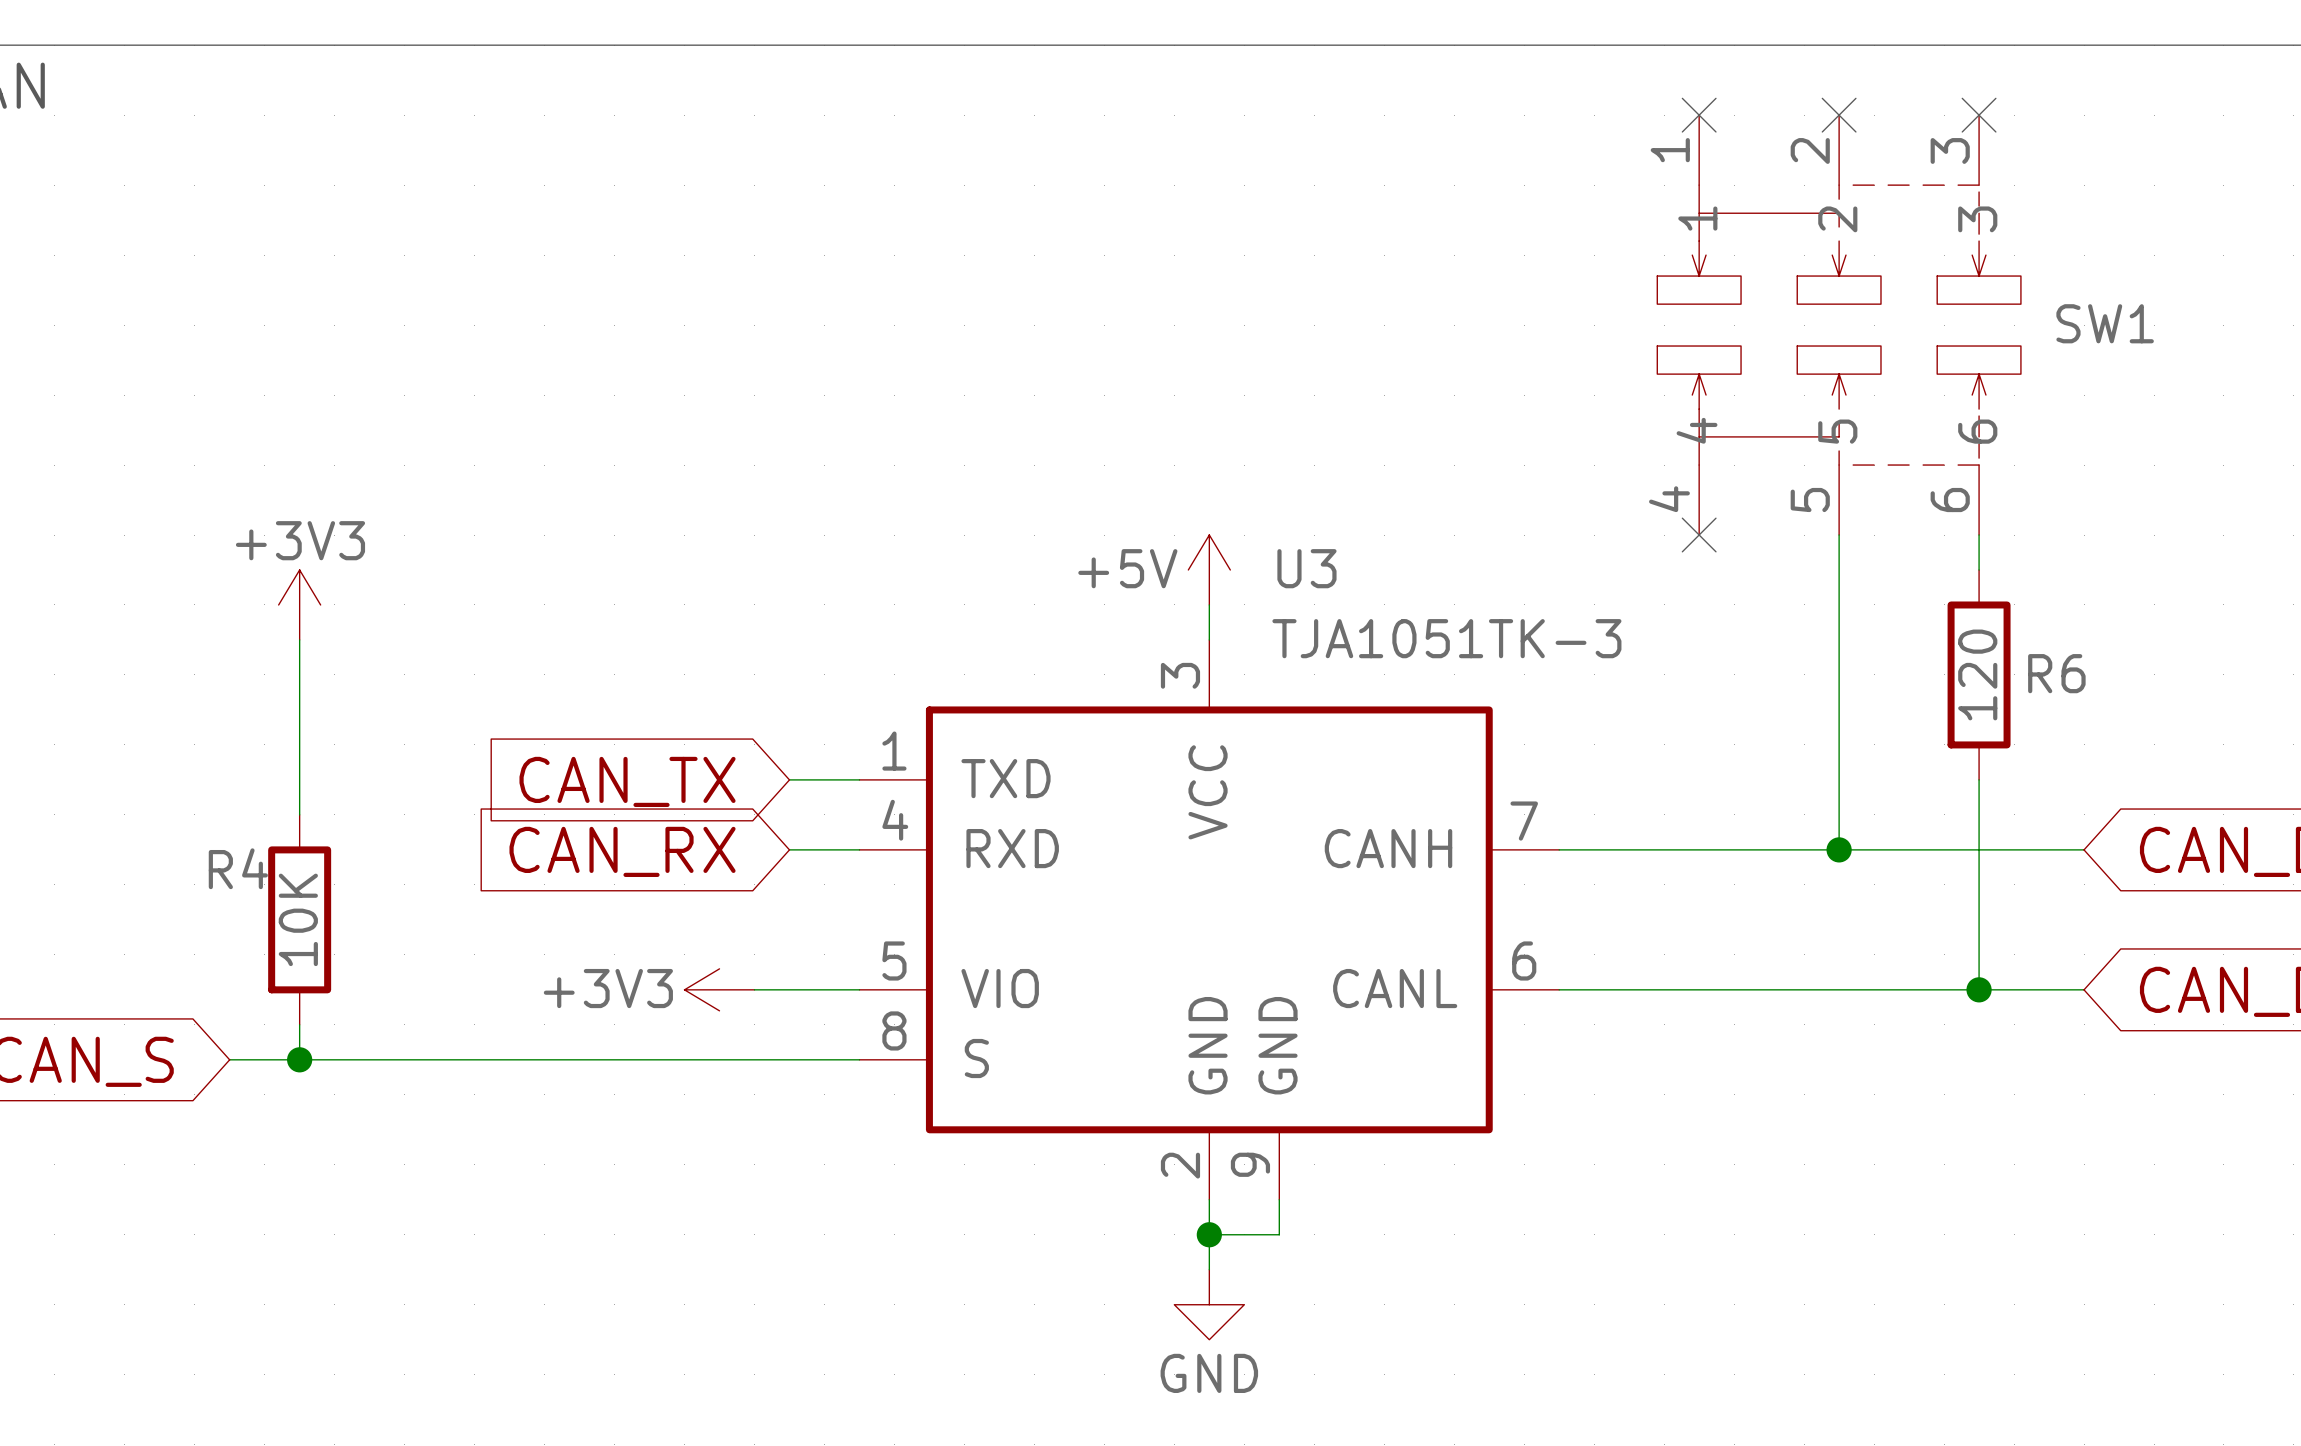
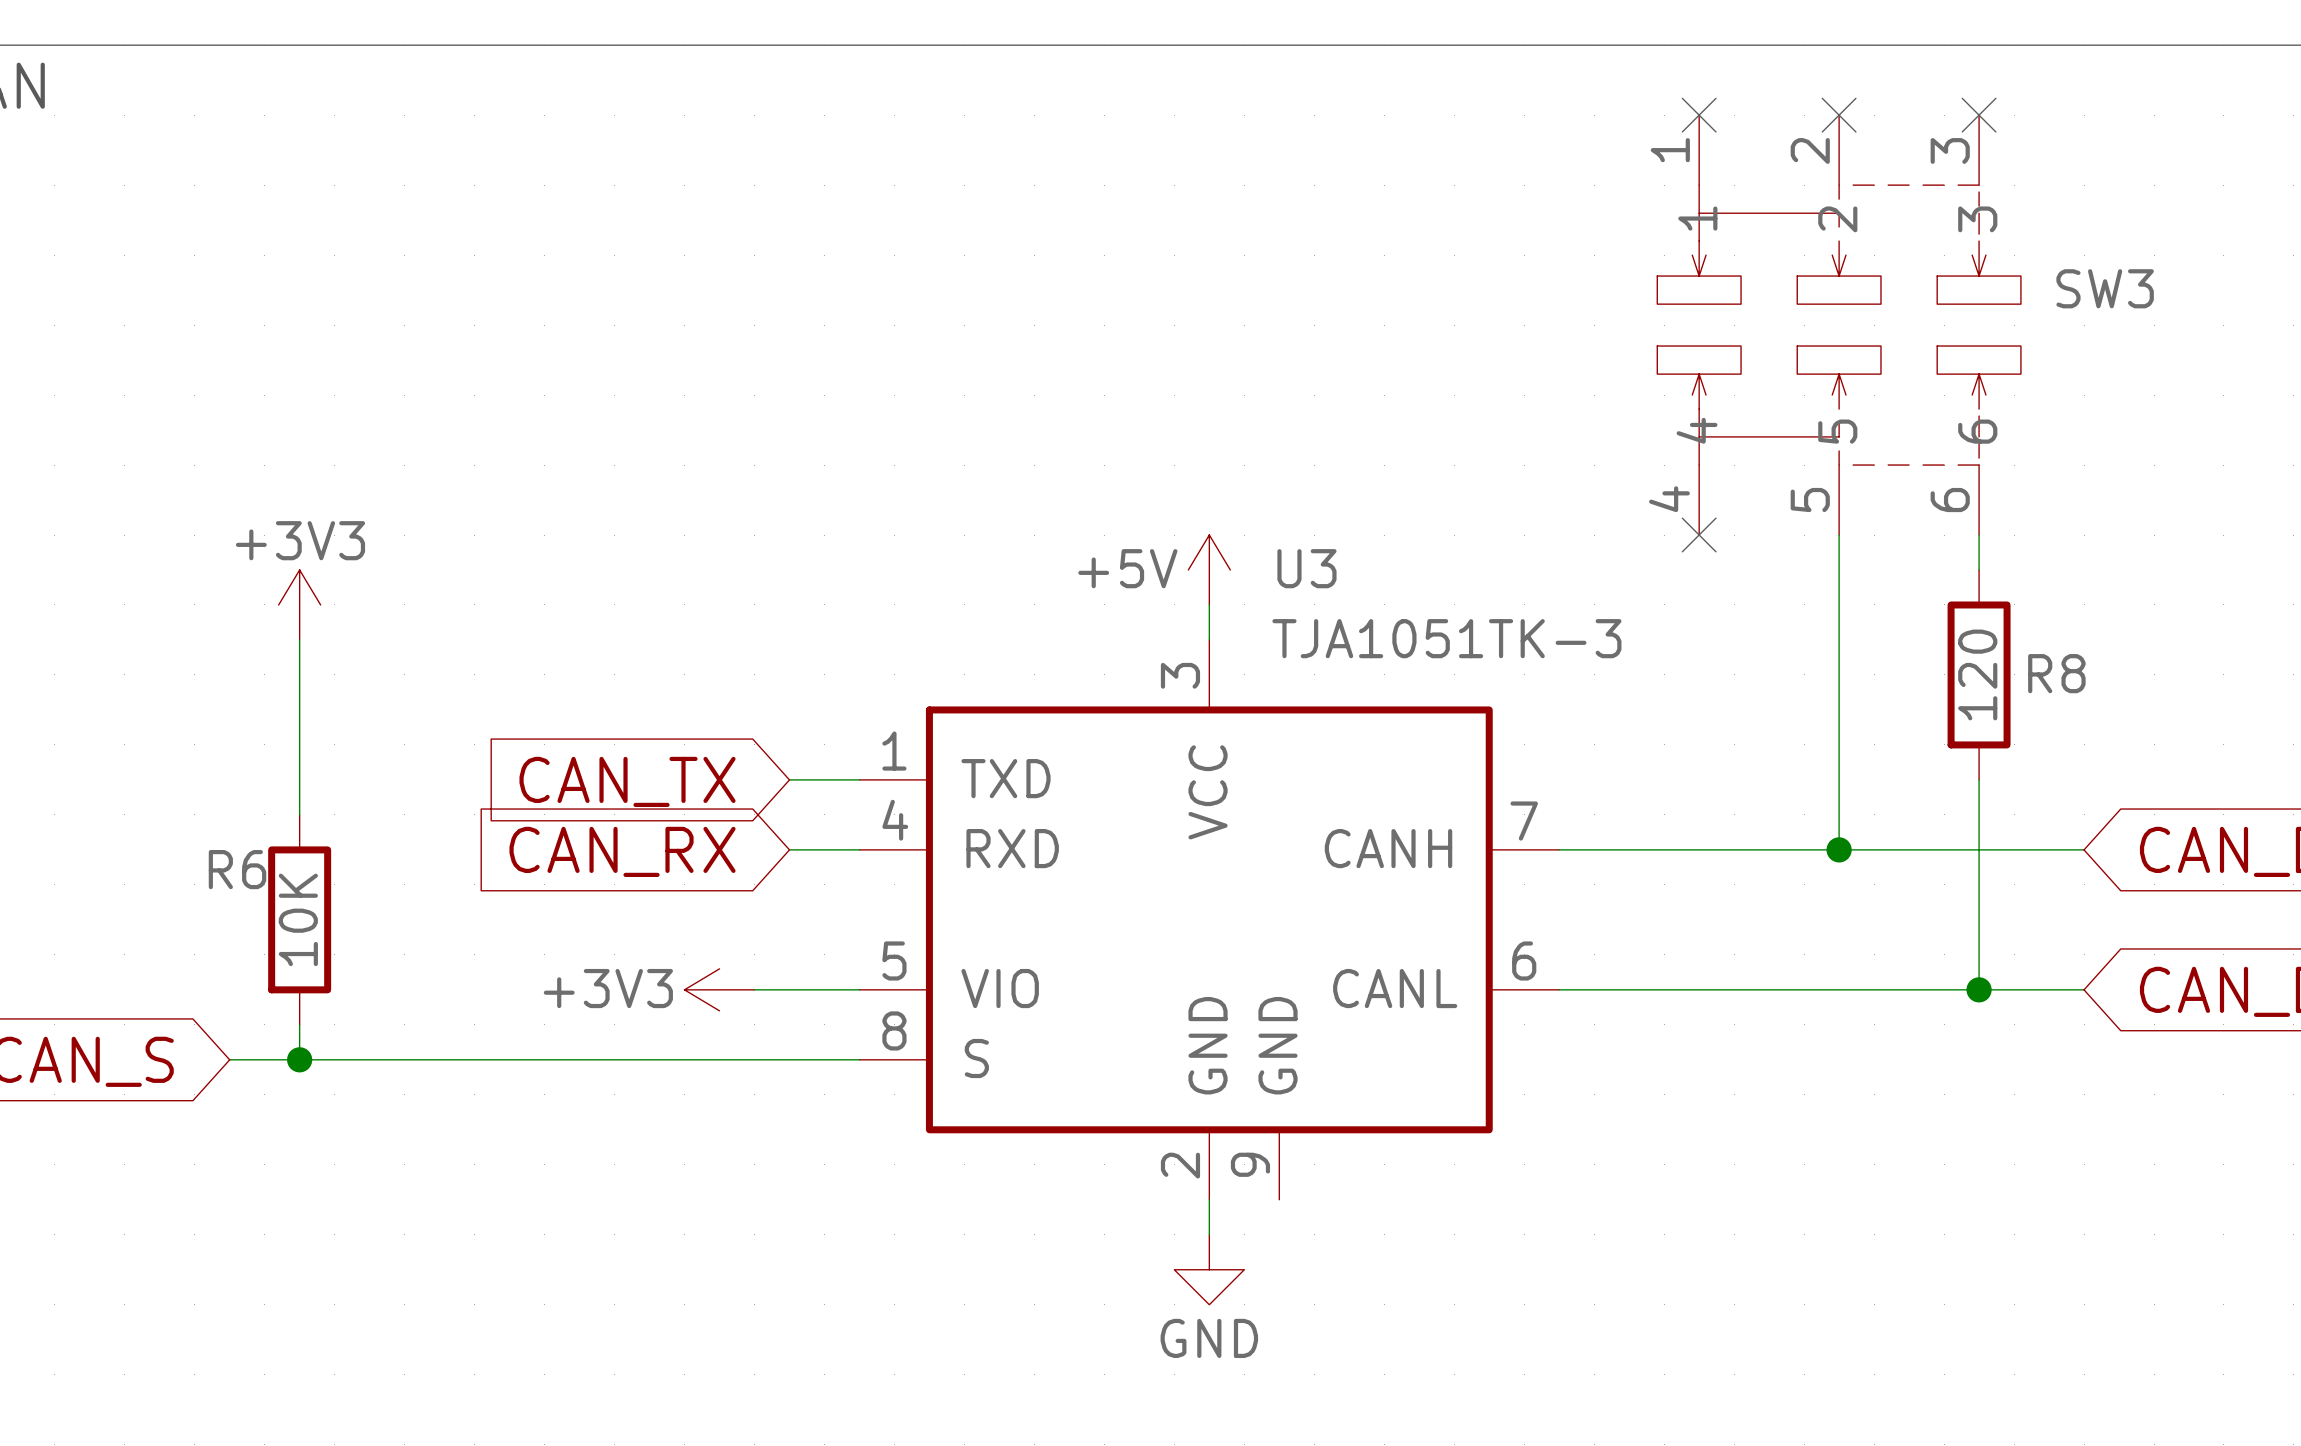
SW1 name: SW1 (2105, 323) -> SW3 (2105, 288)
R6 name: R6 (2056, 673) -> R8 (2056, 673)
R4 name: R4 (238, 868) -> R6 (237, 869)
wire: (1279, 1199) (1279, 1234) (1209, 1234) (1209, 1269) -> none
junction: (1209, 1234) -> none
power symbol position: GND (1209, 1304) -> GND (1209, 1269)

